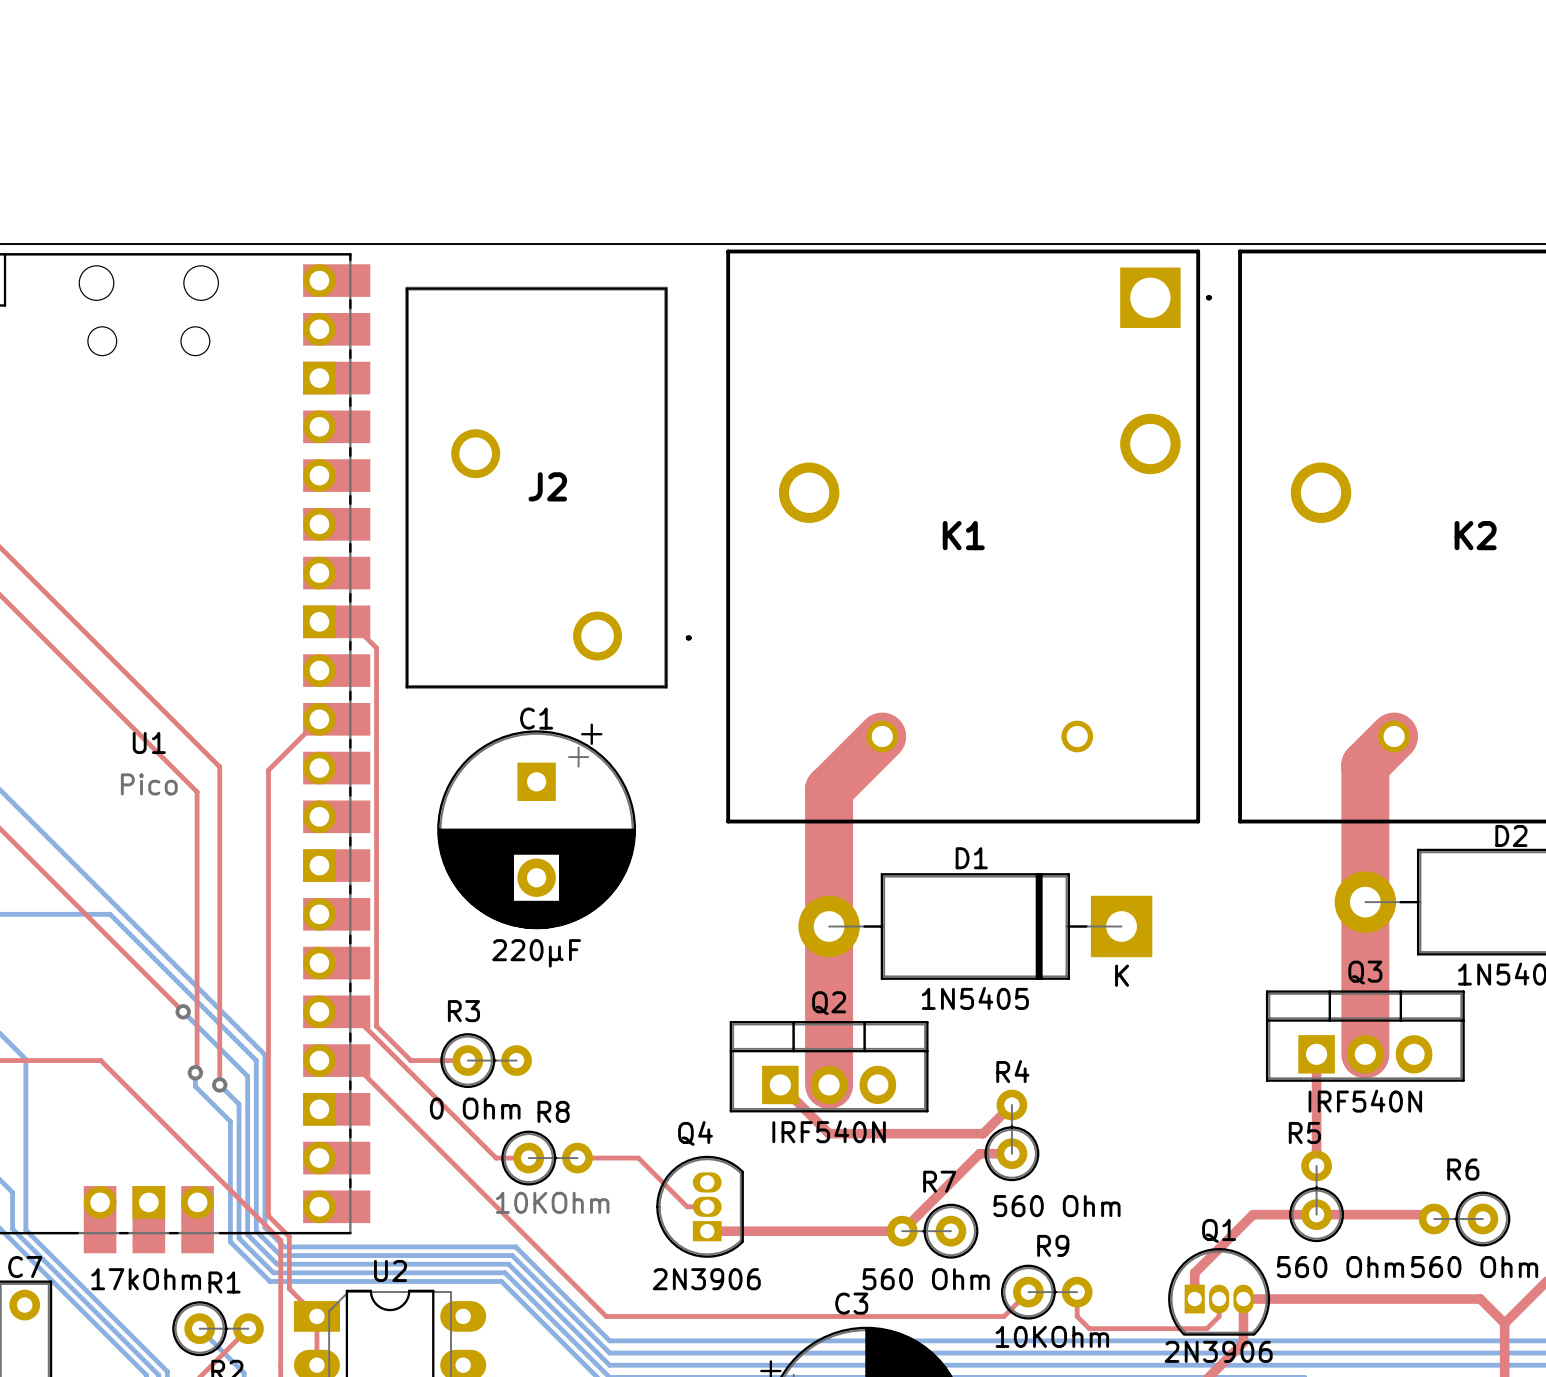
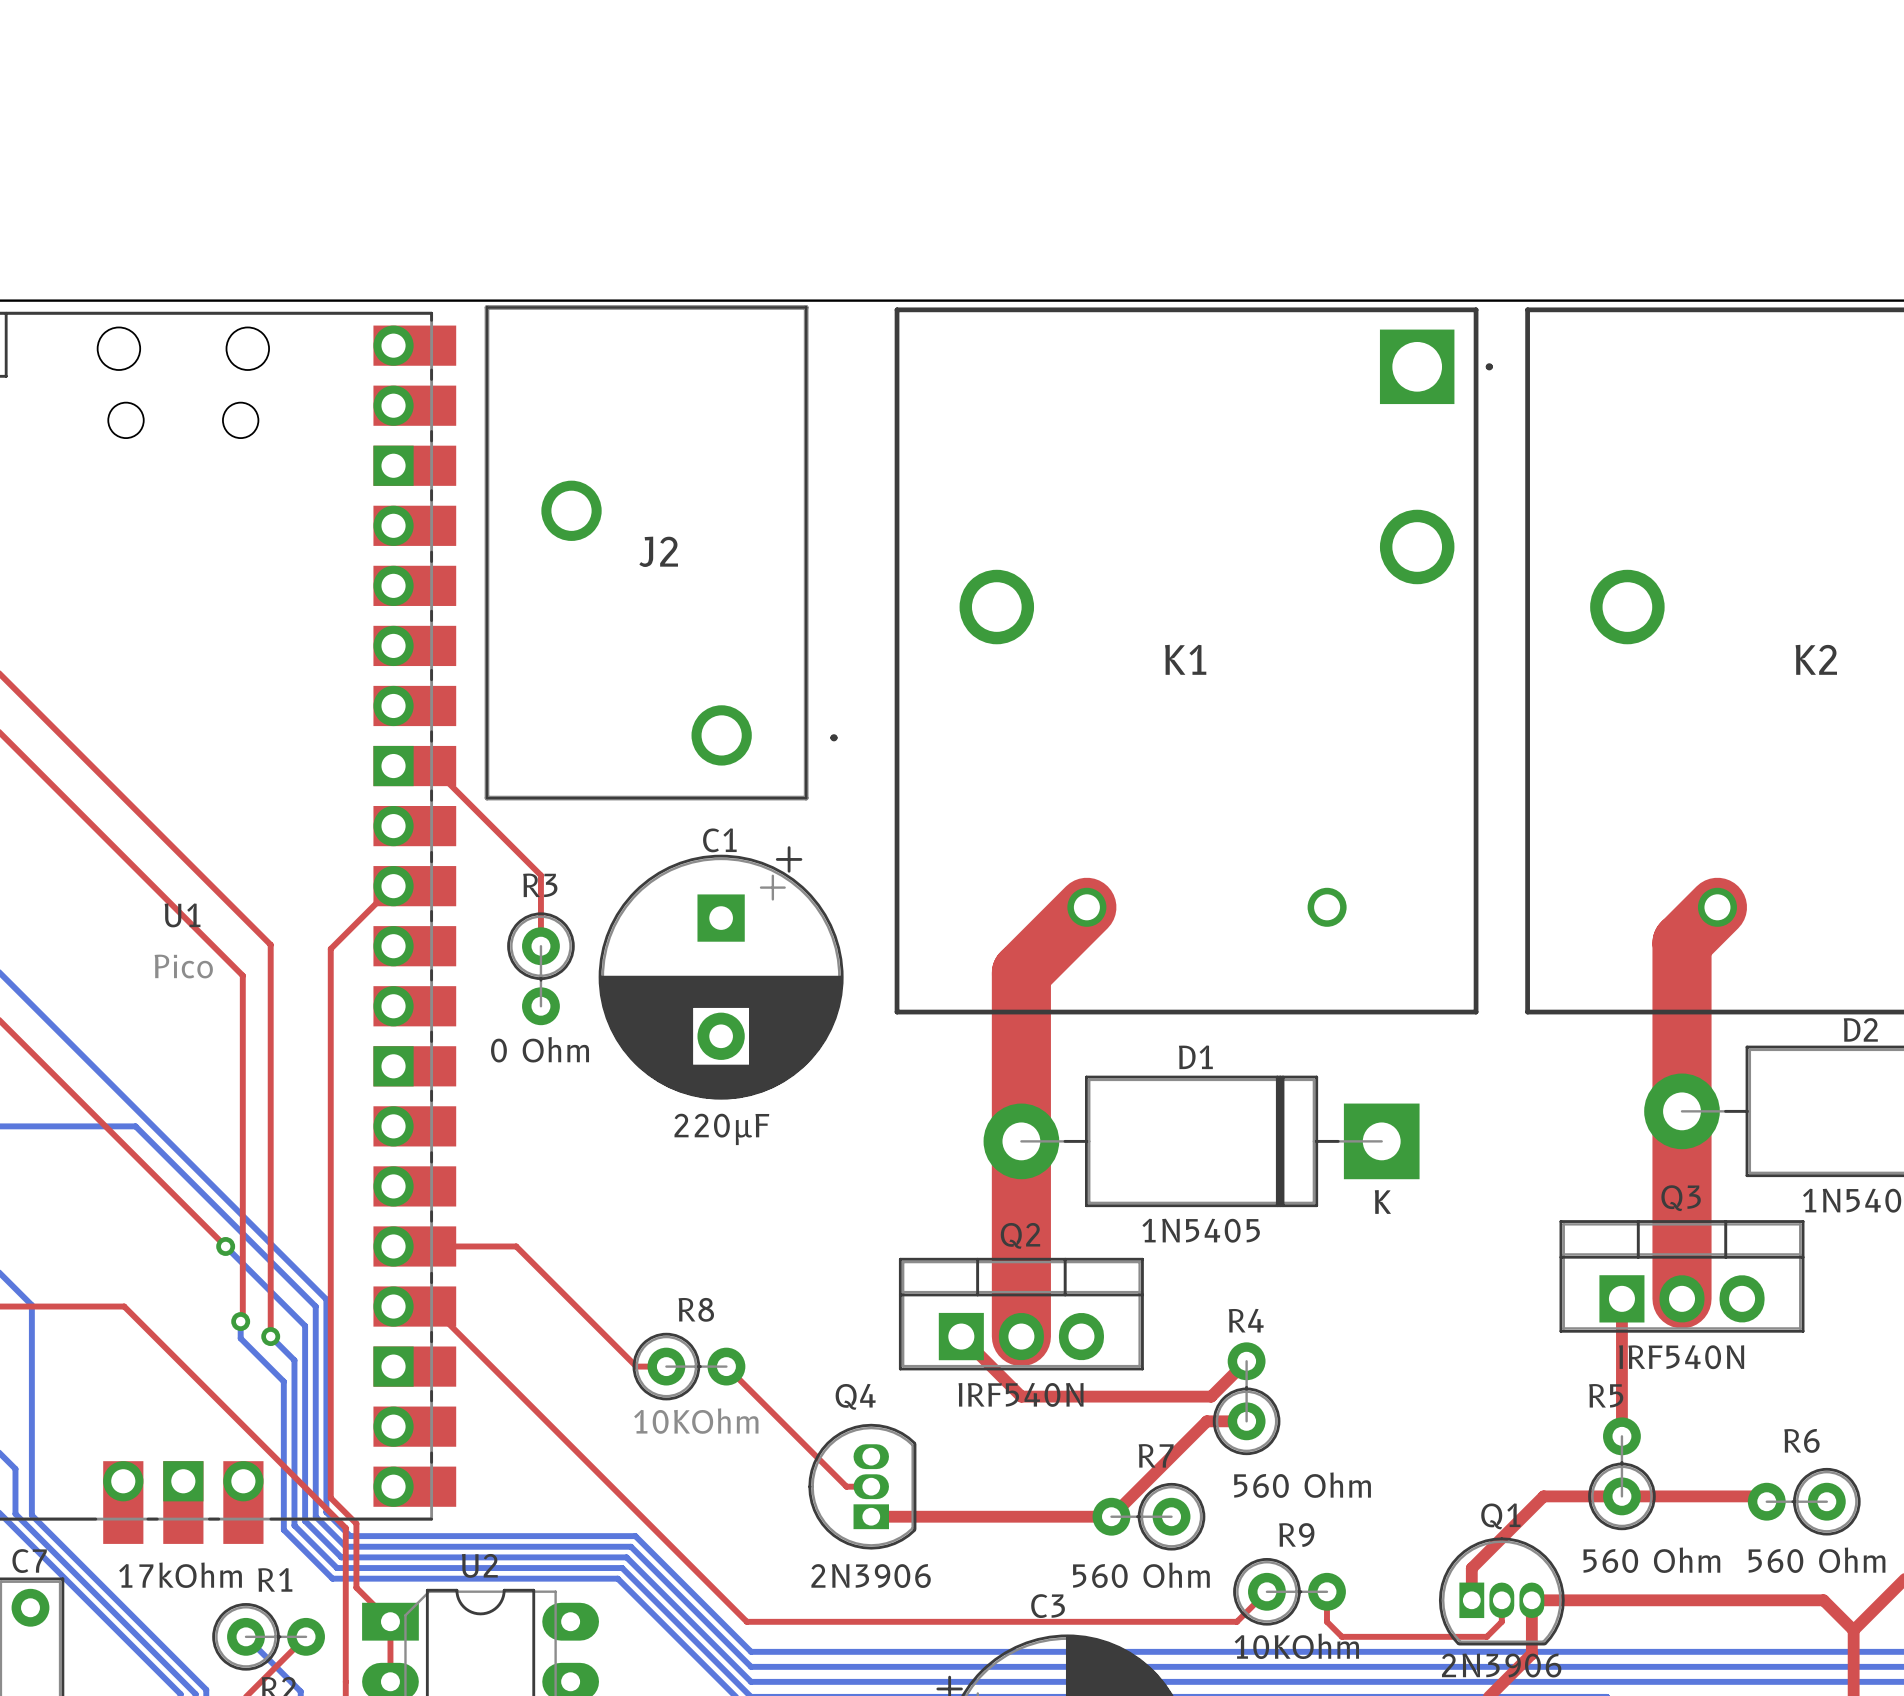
J2 position: (548, 487) -> (661, 552)
top track: (376, 648) (376, 1026) (410, 1060) (467, 1060) -> (463, 798) (540, 875) (540, 946)
C1 position: (536, 826) -> (721, 972)
top track: (349, 1011) (496, 1158) (528, 1158) -> (431, 1246) (516, 1246) (636, 1366) (666, 1366)
R3 rotation: 0° (486, 1060) -> 90° clockwise (540, 968)
R3 position: (486, 1060) -> (540, 968)
R8 position: (547, 1158) -> (688, 1366)
top track: (577, 1158) (638, 1158) -> (726, 1366) (786, 1426)

